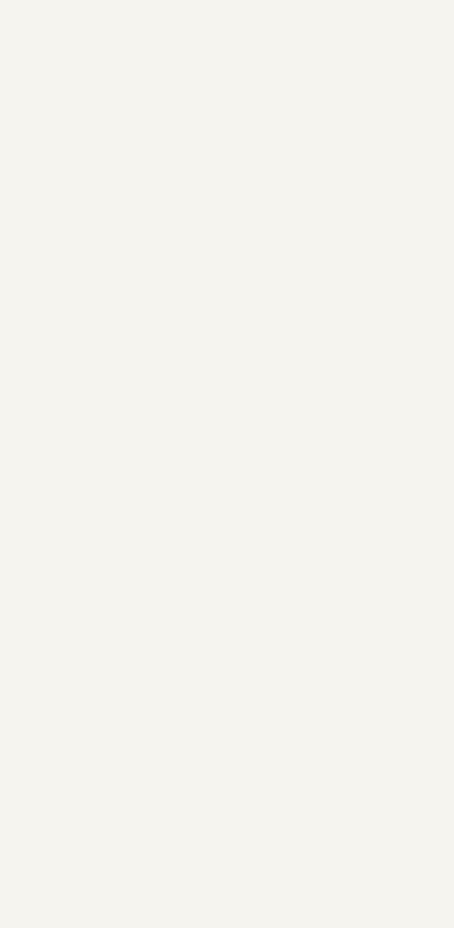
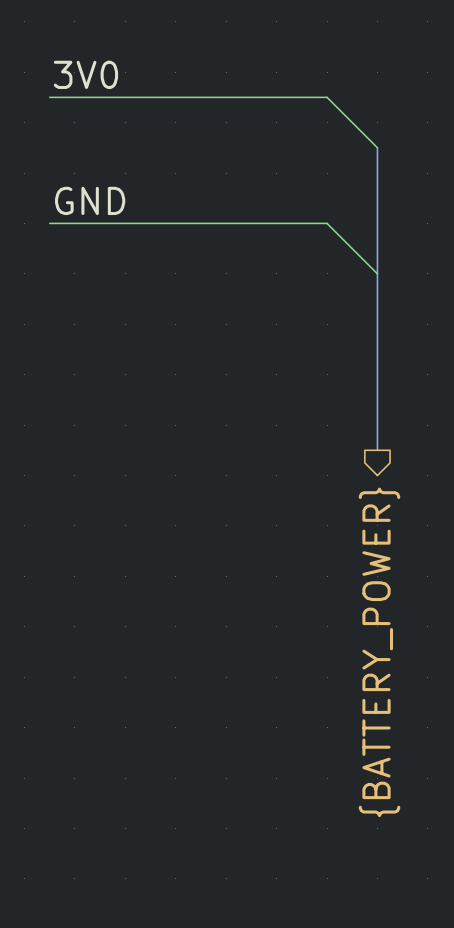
label: none -> 3V0 (85, 74)
wire: none -> (49, 97) (327, 97) (377, 147)
bus: none -> (377, 147) (377, 450)
label: none -> GND (90, 200)
wire: none -> (49, 223) (327, 223) (377, 273)
hierarchical label: none -> {BATTERY_POWER} (379, 652)

